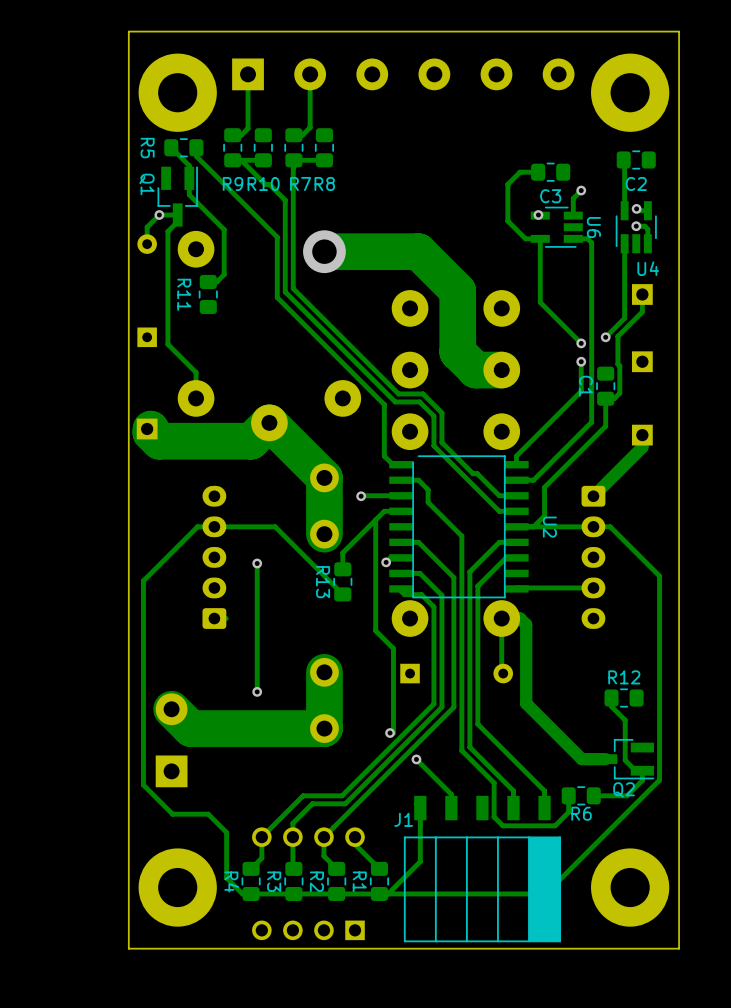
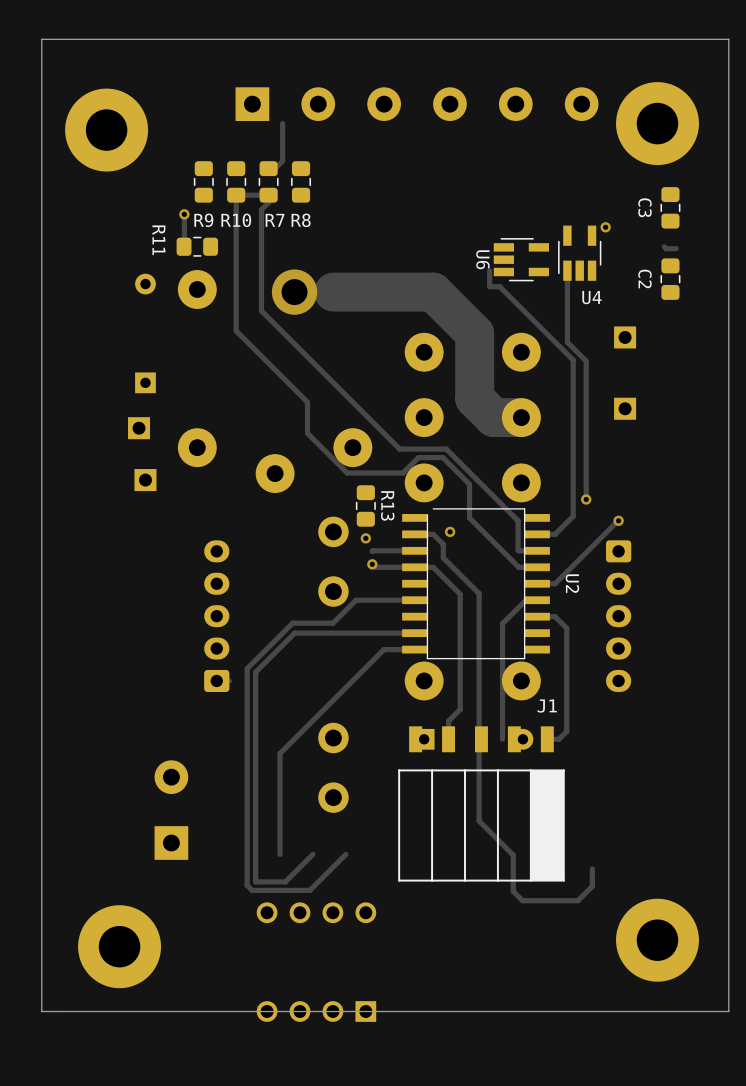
board edge: (679, 31) (679, 948) (128, 948) (128, 31) (679, 31) -> (728, 39) (728, 1011) (41, 1011) (41, 39) (728, 39)
track: (248, 74) (248, 128) (241, 135) (232, 135) -> none
track: (310, 74) (310, 127) (302, 135) (293, 135) -> none
part position: (177, 92) -> (106, 130)
track: none -> (282, 123) (282, 161) (275, 168)
track: (171, 147) (189, 165) (189, 194) (224, 229) (224, 274) (216, 281) (208, 281) -> none
R5: (183, 147) -> none
track: (196, 147) (196, 156) (277, 237) (277, 297) (384, 404) (384, 456) (392, 464) (401, 464) -> none
R9: none -> (203, 181)
R8: (324, 147) -> none
track: (623, 159) (624, 210) -> none
C2 rotation: 0° (636, 159) -> 90° clockwise (670, 279)
C2 position: (636, 159) -> (670, 279)
track: (241, 160) (265, 184) (269, 184) (285, 200) (285, 291) (395, 401) (419, 401) (433, 416) (433, 445) (452, 464) -> (236, 195) (236, 330) (307, 402) (307, 433) (347, 472) (403, 472) (418, 457) (442, 457) (469, 484) (469, 518)
track: (324, 160) (293, 160) (293, 288) (398, 393) (422, 393) (441, 412) (441, 442) (473, 473) (477, 473) (498, 495) -> (268, 195) (268, 202) (261, 209) (261, 310) (399, 449) (446, 449) (518, 520) (518, 550)
track: (538, 172) (520, 172) (507, 184) (507, 221) (525, 238) (540, 238) (540, 302) (581, 343) -> none
C3 rotation: 0° (550, 172) -> 90° clockwise (670, 207)
C3 position: (550, 172) -> (670, 207)
track: none -> (184, 214) (184, 246)
R9 name: R9 (233, 183) -> R10 (236, 220)
R10 name: R10 (263, 183) -> R7 (275, 220)
R7 name: R7 (300, 183) -> R8 (301, 220)
track: (581, 190) (573, 198) (573, 215) -> none
Q1: (177, 196) -> none
via: (636, 208) -> none
via position: (159, 215) -> (184, 214)
via: (538, 215) -> none
track: (636, 226) (644, 226) (647, 229) (647, 243) -> none
via: (636, 226) -> none
U6 rotation: 0° (556, 227) -> 180° (521, 259)
U6 position: (556, 227) -> (521, 259)
U4 position: (636, 227) -> (579, 253)
track: none -> (567, 270) (567, 342) (586, 361) (586, 499)
track: (573, 238) (587, 238) (591, 242) (591, 422) (550, 463) -> (489, 270) (489, 286) (499, 286) (573, 360) (573, 516)
track: (624, 243) (624, 318) (605, 337) -> none
track: (147, 244) (147, 227) (159, 215) (177, 215) (177, 221) (167, 231) (167, 344) (196, 372) (196, 398) -> none
via position: (324, 251) -> (294, 292)
R11 rotation: 0° (208, 294) -> 90° clockwise (197, 246)
R11 position: (208, 294) -> (197, 246)
part: none -> (625, 337)
track: (642, 294) (642, 311) (617, 336) (619, 393) (614, 398) (605, 398) (605, 426) (544, 487) (544, 515) -> (618, 520) (566, 572)
part: (642, 294) -> none
via: (605, 337) -> none
via: (581, 343) -> none
track: (581, 361) (581, 391) (516, 456) (516, 464) -> none
via: (581, 361) -> none
part: none -> (625, 408)
part: (642, 361) -> none
part: none -> (139, 428)
C1: (605, 386) -> none
track: (150, 428) (150, 432) (159, 441) (251, 441) (269, 422) (324, 477) (324, 534) -> none
track: (642, 435) (642, 447) (593, 496) -> none
part: (642, 435) -> none
via: none -> (586, 499)
via: none -> (618, 520)
via: none -> (450, 531)
via: none -> (365, 538)
via: (361, 496) -> none
via: none -> (372, 564)
track: (384, 511) (342, 552) (342, 569) -> (396, 567) (375, 567) (372, 564)
track: none -> (415, 567) (433, 567) (460, 594) (460, 709) (448, 721) (448, 739)
track: (375, 519) (375, 630) (393, 648) (393, 733) (390, 733) -> none
track: (533, 526) (610, 526) (659, 576) (659, 780) (545, 893) (242, 893) (226, 878) (226, 832) (208, 814) (172, 814) (143, 785) (143, 580) (197, 526) (275, 526) (342, 594) -> none
track: (401, 542) (418, 542) (453, 577) (453, 707) (323, 837) (323, 856) (336, 868) -> (415, 600) (356, 600) (333, 623) (292, 623) (247, 668) (247, 885) (252, 890) (309, 890) (345, 854)
track: (506, 542) (499, 542) (469, 571) (469, 747) (513, 790) (513, 808) -> (525, 600) (502, 623) (502, 739)
track: (516, 557) (506, 557) (477, 586) (477, 724) (544, 790) (544, 808) -> (536, 616) (555, 616) (566, 628) (566, 731) (558, 739) (547, 739)
via: (386, 562) -> none
track: (257, 563) (257, 691) -> none
via: (257, 563) -> none
track: (401, 573) (419, 573) (441, 595) (441, 707) (345, 803) (312, 803) (292, 823) (293, 868) -> (415, 633) (294, 633) (255, 672) (255, 881) (285, 881) (312, 854)
R13 position: (342, 581) -> (365, 505)
R13 name position: R13 (323, 582) -> R13 (387, 505)
track: (593, 587) (516, 588) -> none
track: (401, 588) (404, 594) (421, 594) (433, 607) (433, 703) (342, 795) (303, 795) (261, 837) (261, 858) (251, 868) -> (415, 649) (383, 649) (280, 753) (280, 854)
track: (501, 618) (520, 618) (526, 624) (526, 703) (581, 759) (605, 759) -> none
track: (501, 618) (503, 673) -> none
track: (324, 672) (324, 728) (190, 728) (171, 709) -> none
via: (257, 691) -> none
track: (611, 698) (611, 706) (625, 720) (625, 760) (635, 770) (642, 770) (642, 780) (627, 795) (593, 795) -> none
R12: (624, 698) -> none
via: (390, 733) -> none
track: (416, 759) (451, 794) (451, 808) -> none
via: (416, 759) -> none
Q2: (624, 759) -> none
R6: (581, 795) -> none
track: (416, 803) (420, 808) (420, 861) (388, 893) -> none
J1 name position: J1 (403, 819) -> J1 (547, 706)
track: (355, 837) (355, 844) (379, 868) -> none
J1 position: (482, 869) -> (481, 803)
R4: (251, 881) -> none
R3: (293, 881) -> none
R2: (336, 881) -> none
R1: (379, 881) -> none
part position: (177, 887) -> (119, 946)
part position: (630, 887) -> (657, 940)

